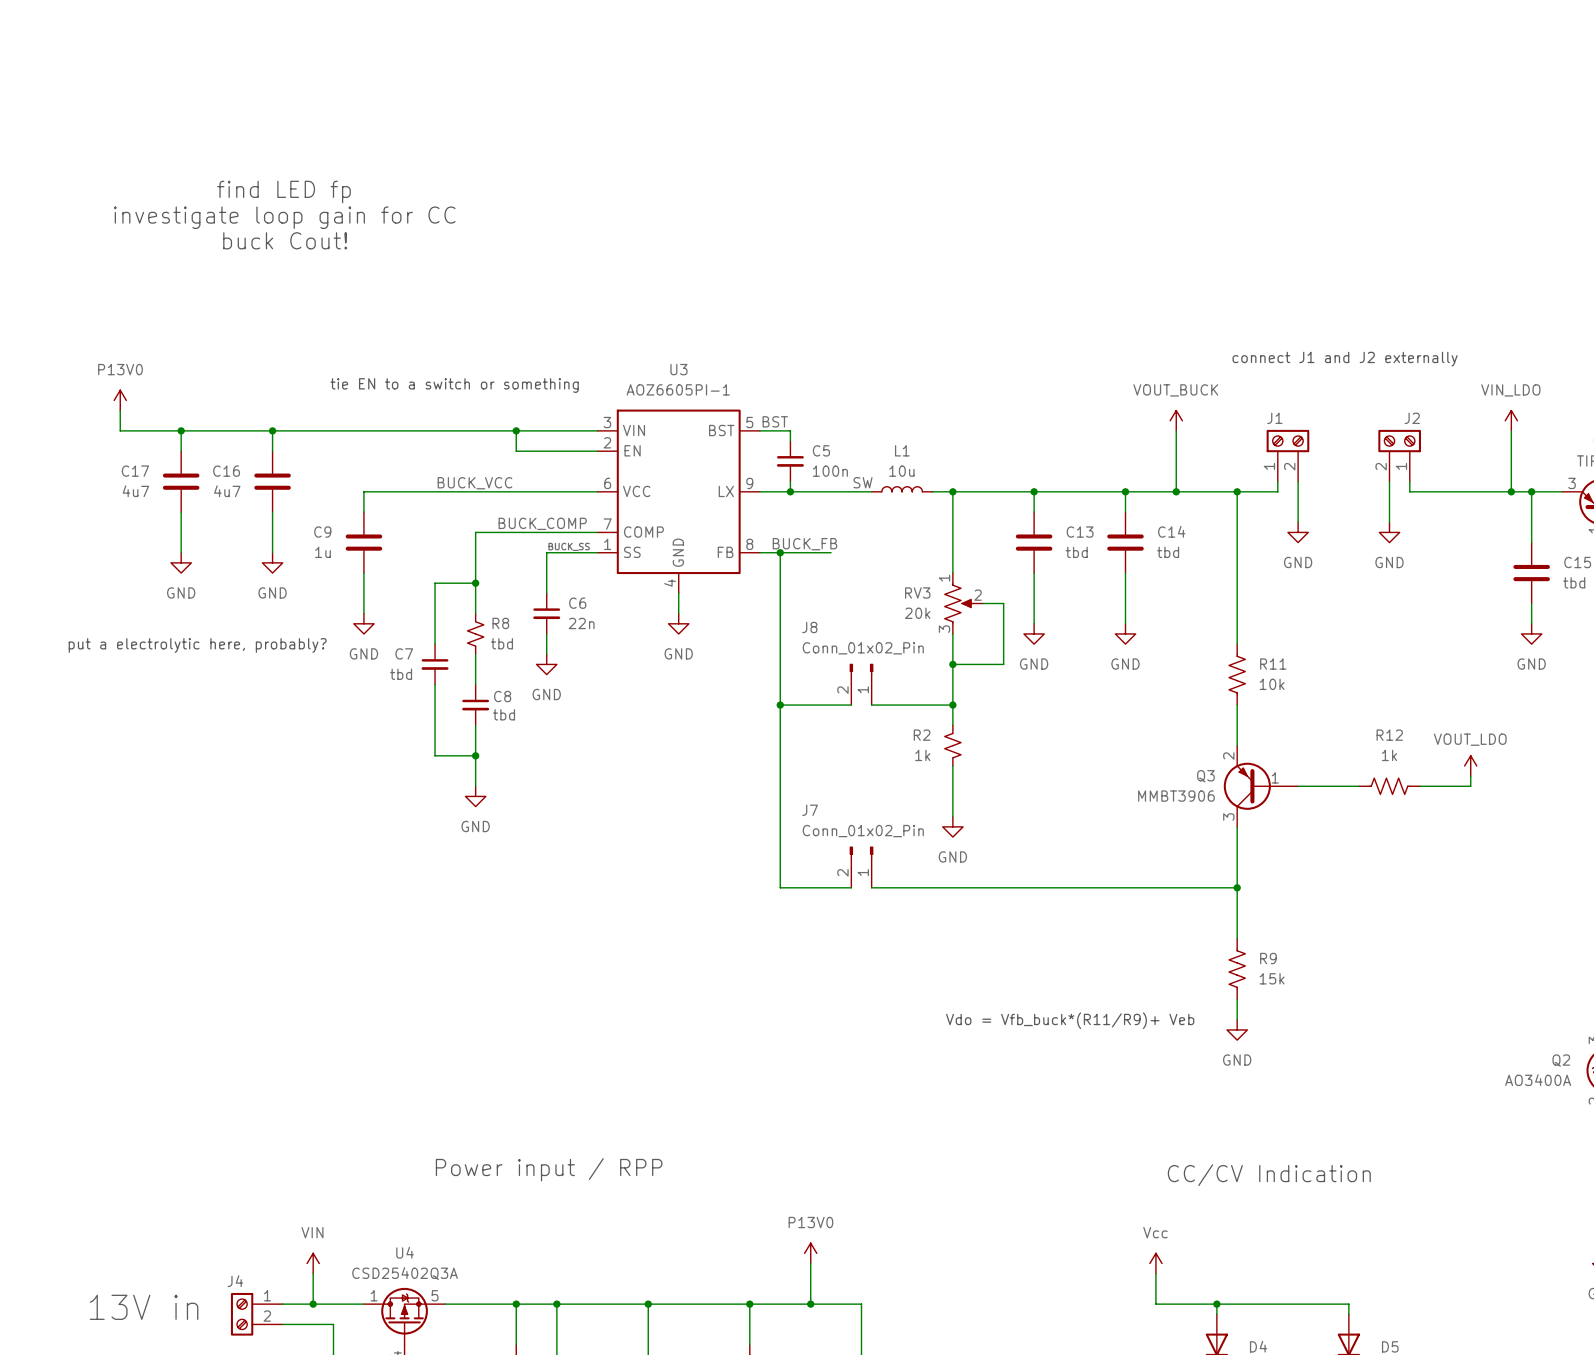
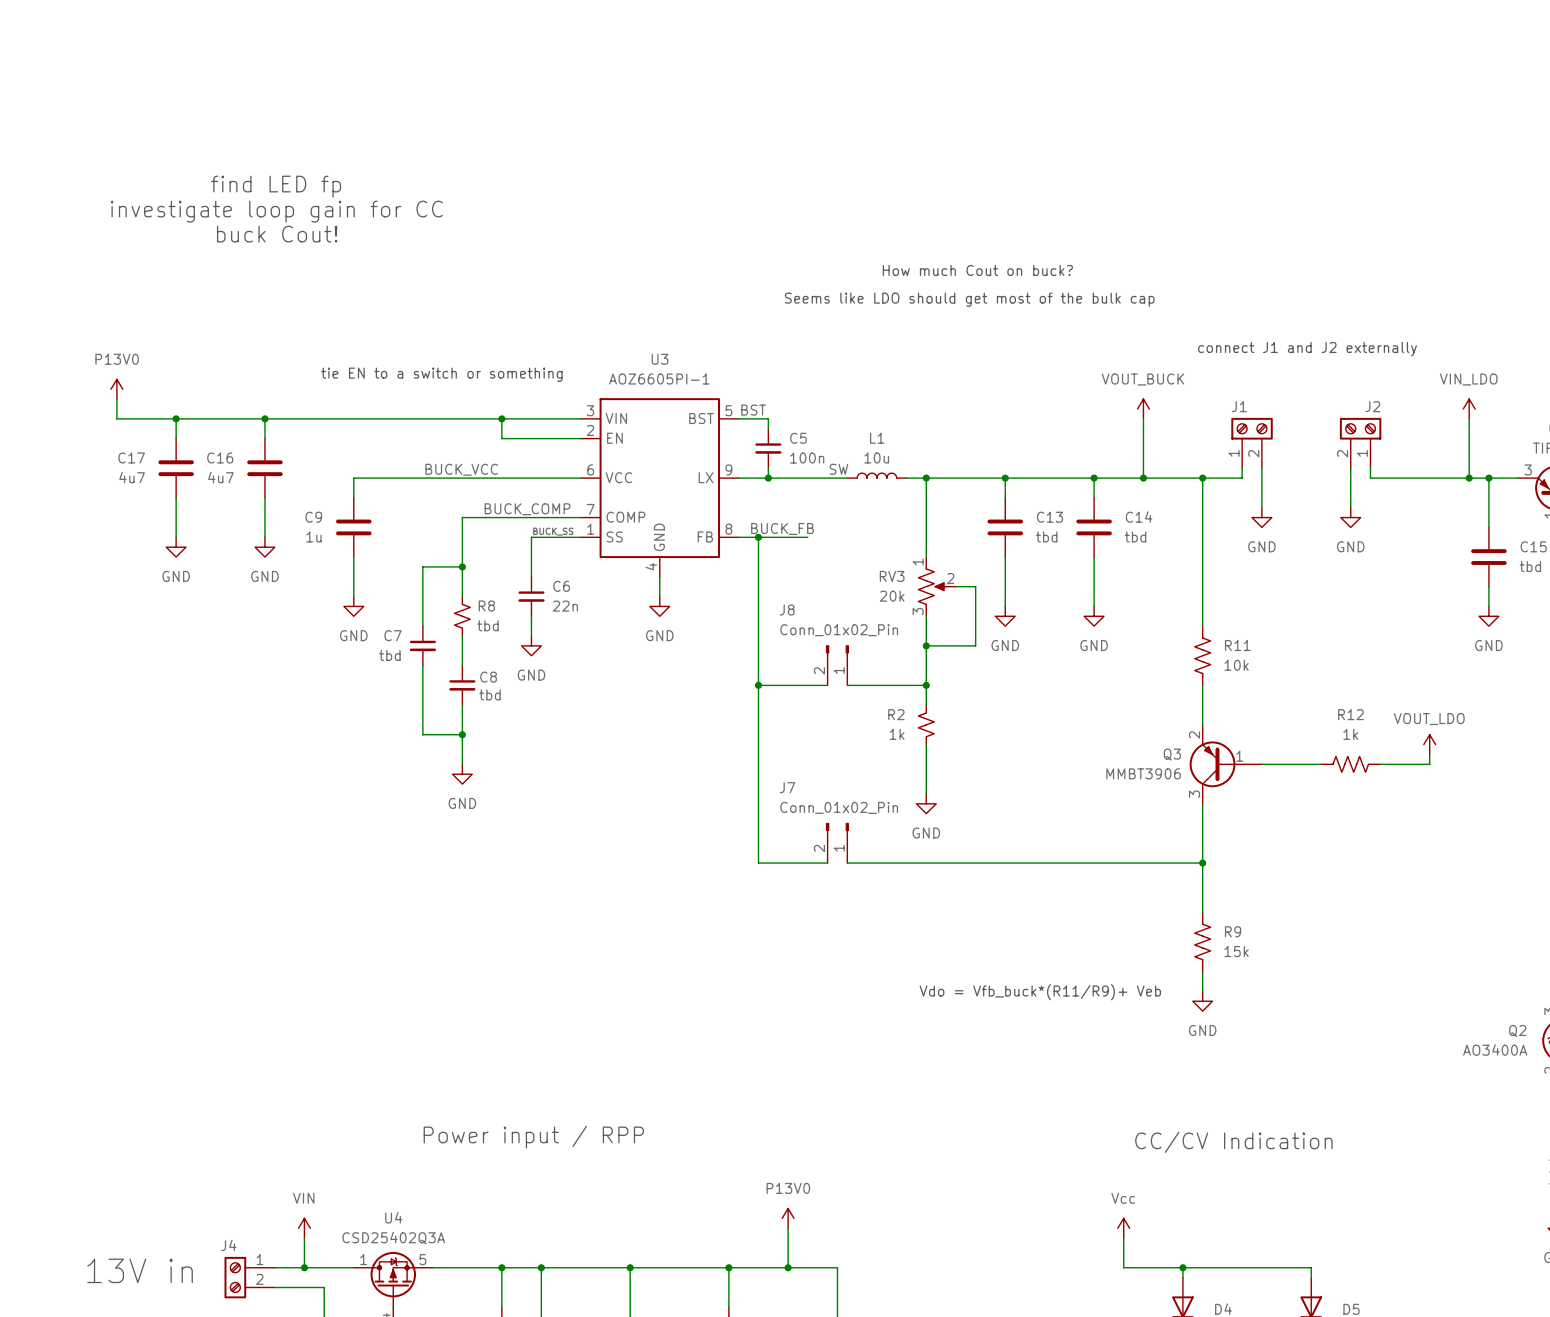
text: none -> How much Cout on buck? (977, 270)
text: none -> Seems like LDO should get most of the bulk cap (969, 299)
text: put a electrolytic here, probably? (197, 645) -> none

